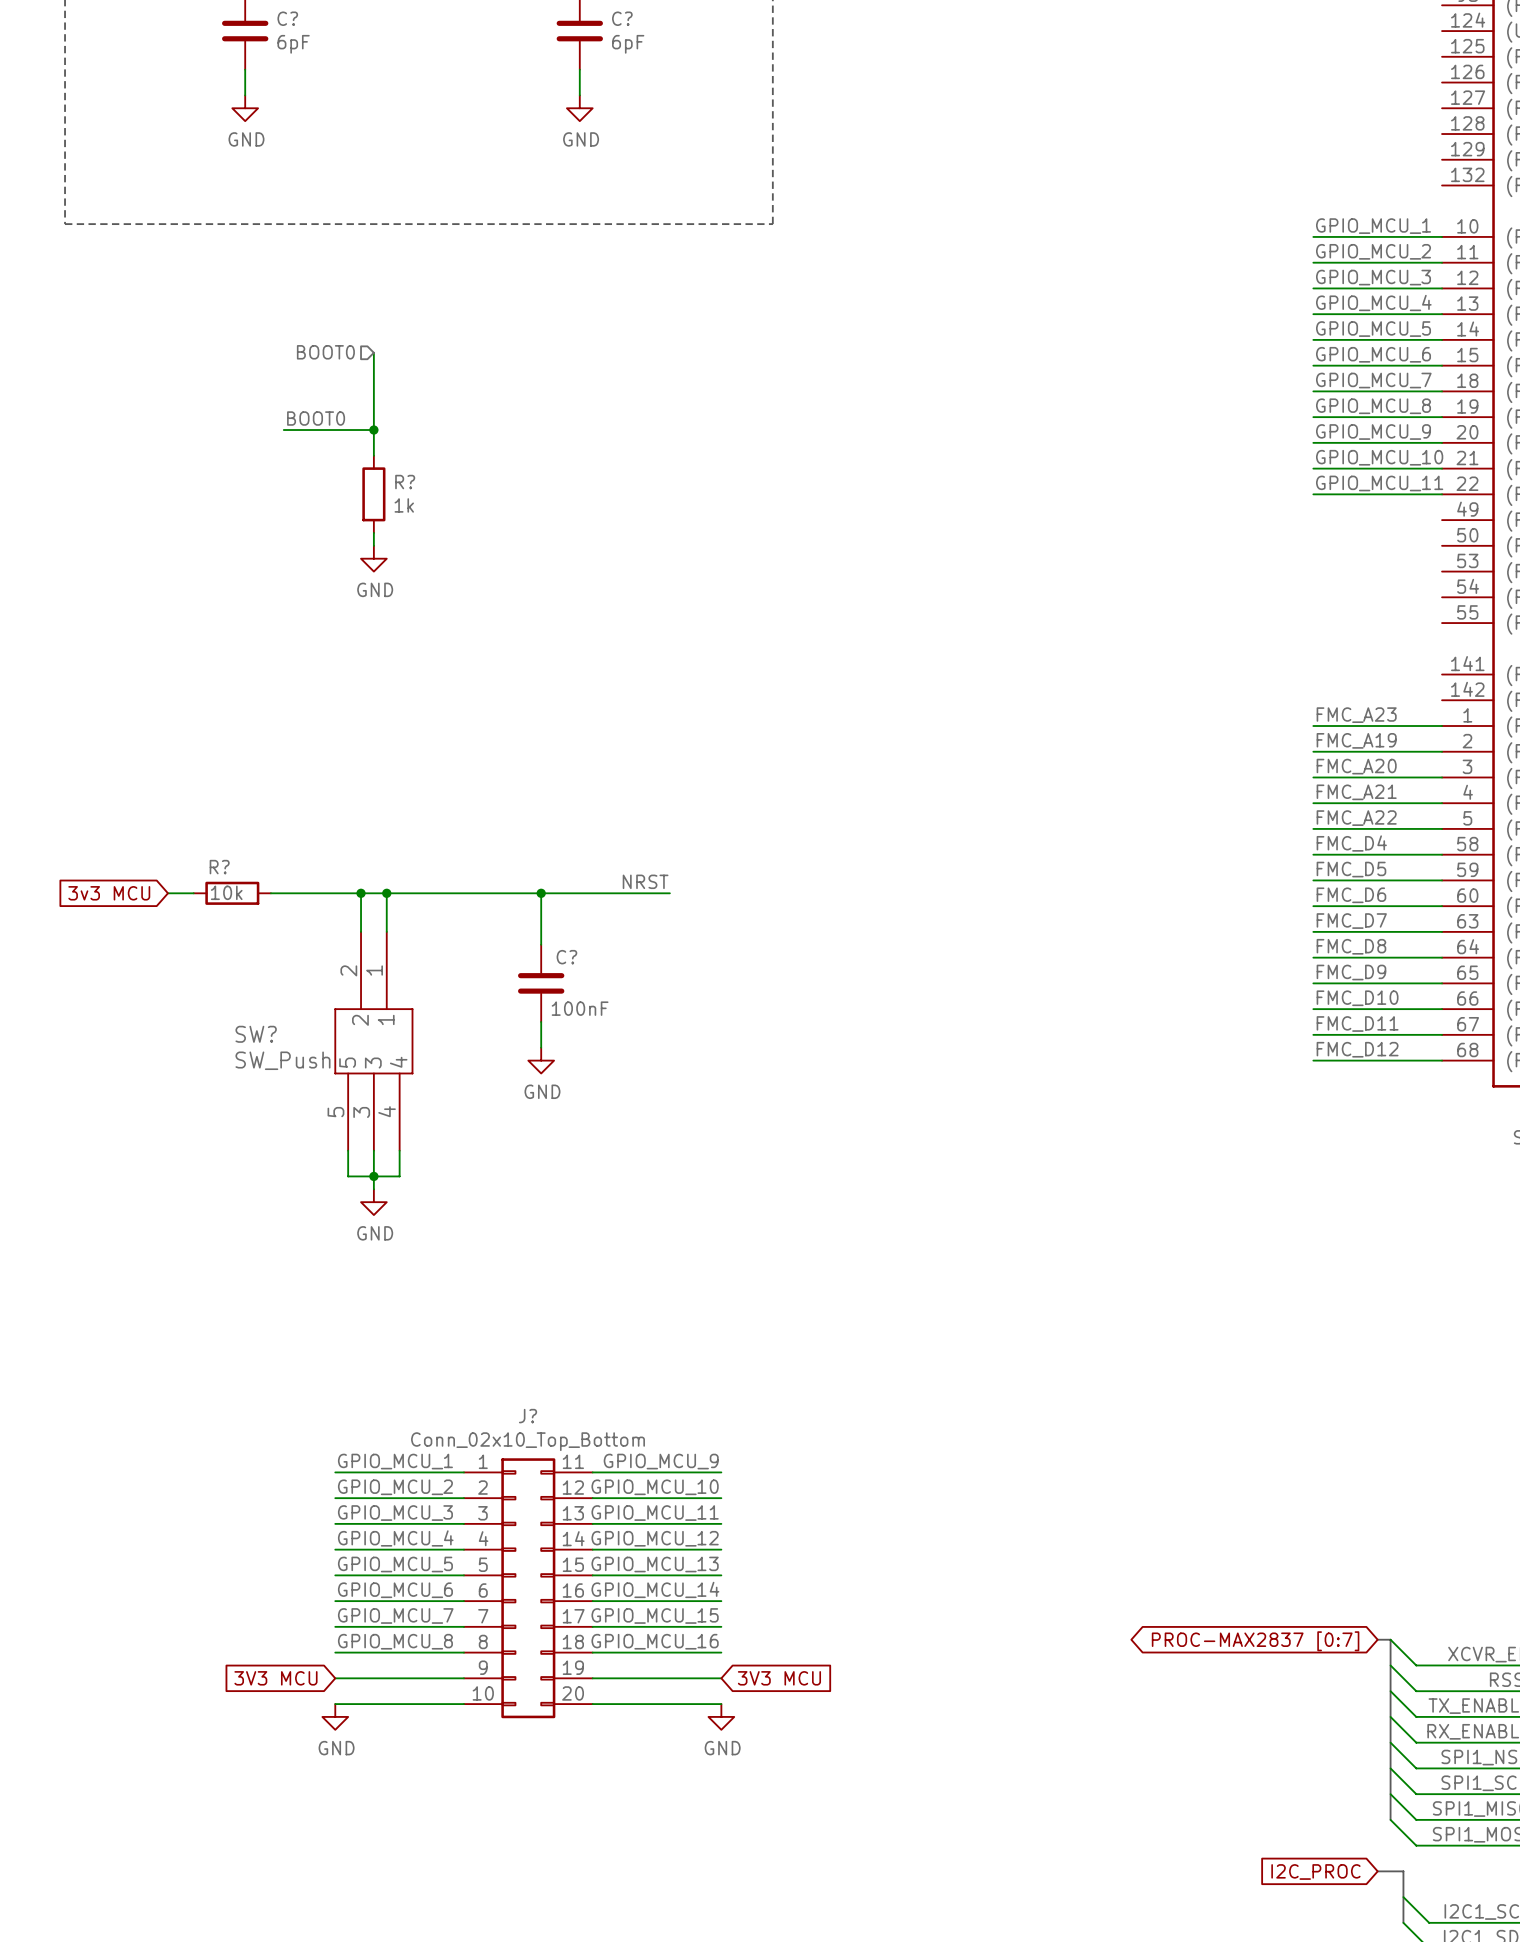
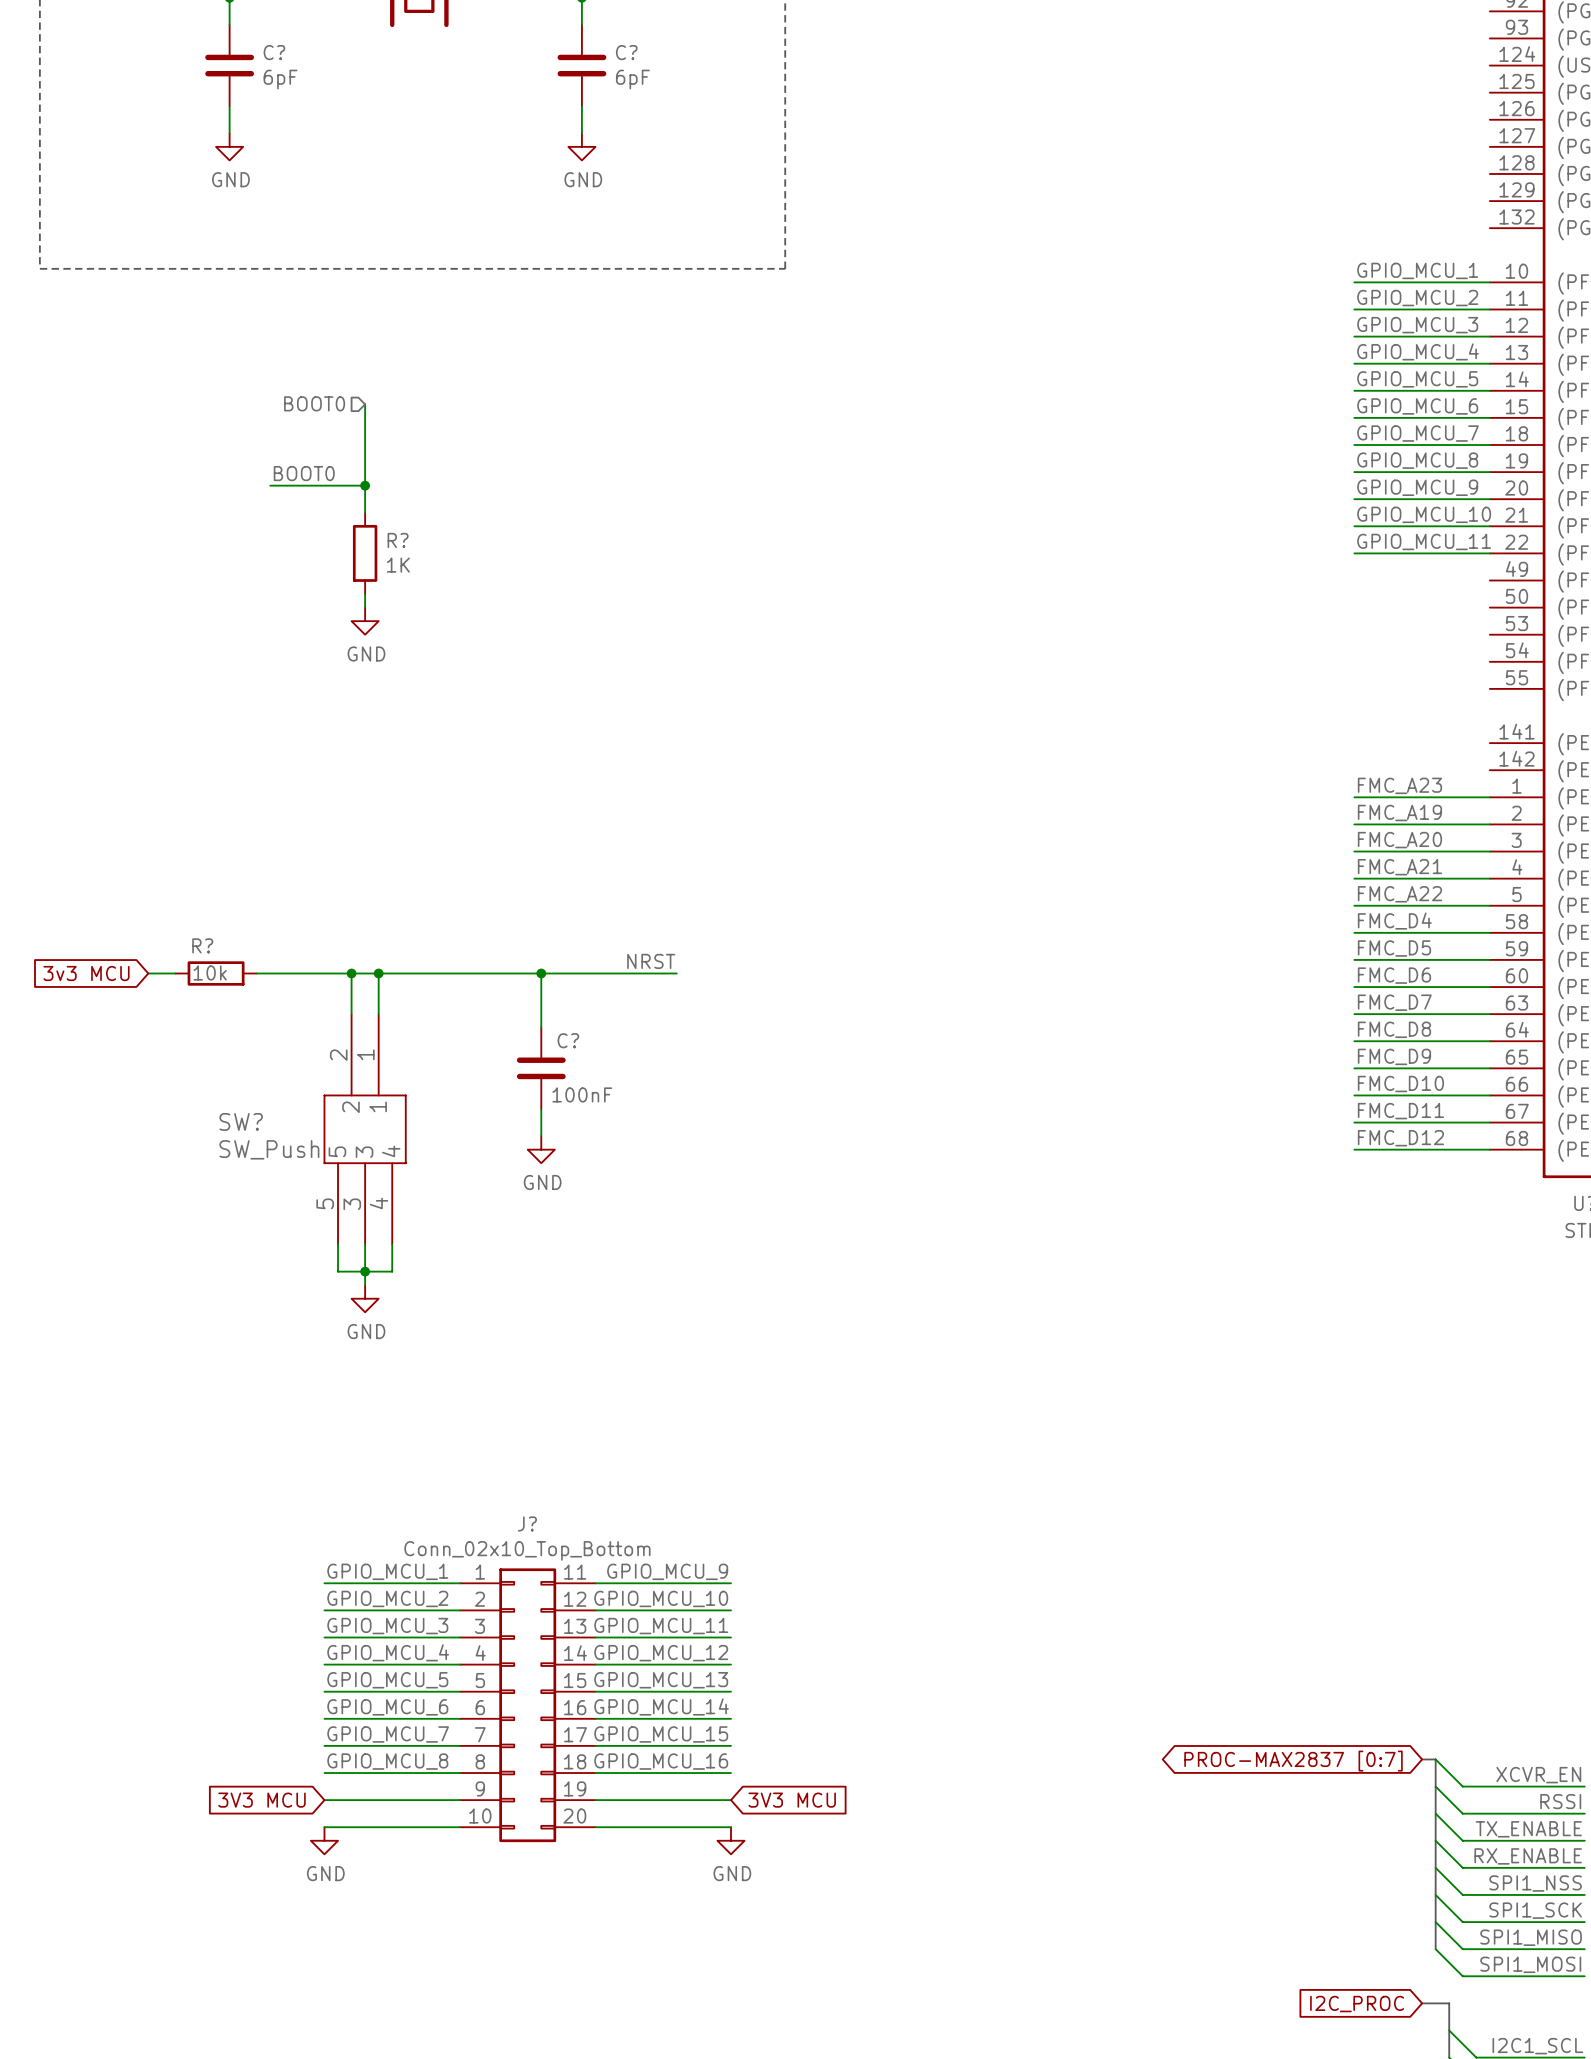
R? value: 1k (404, 505) -> 1K (398, 565)

